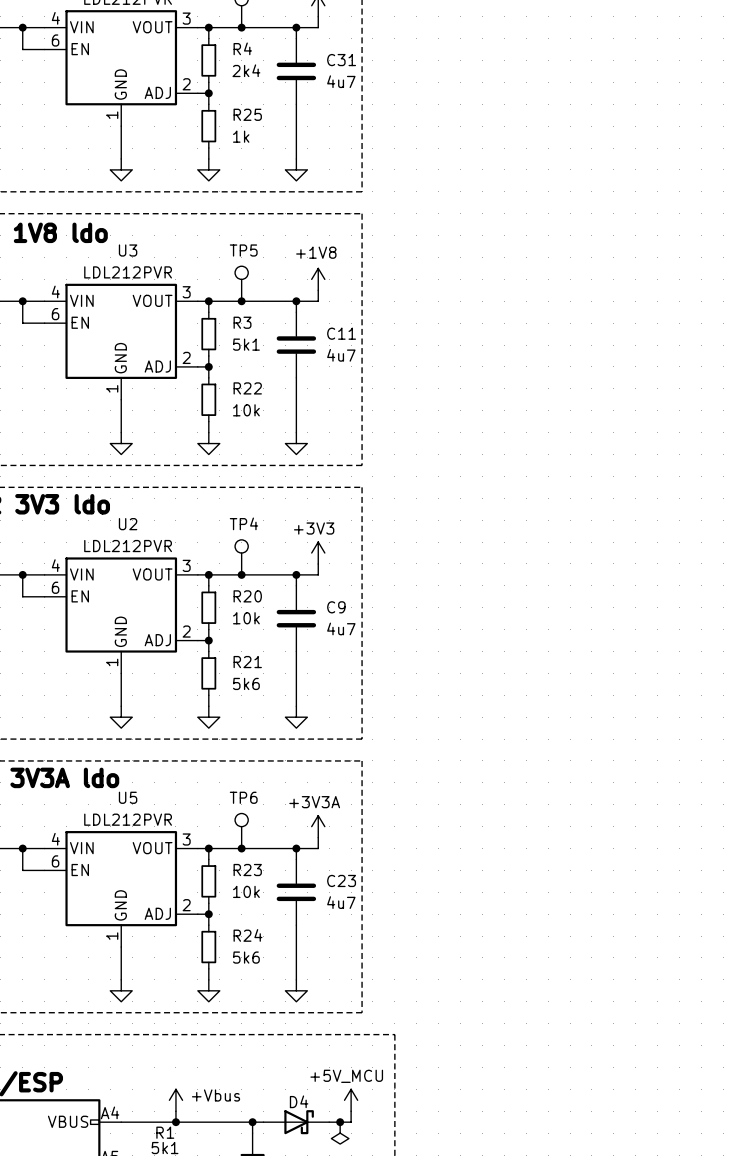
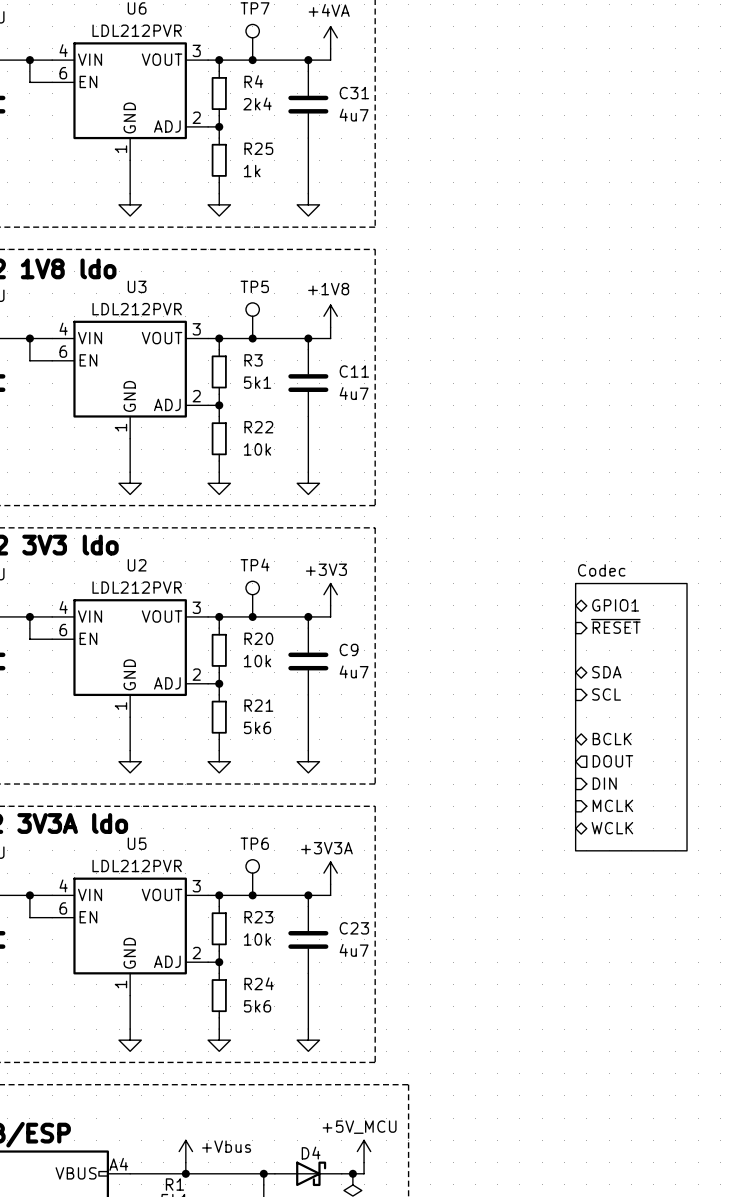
sheet pin: none -> GPIO1 (615, 605)
sheet pin: none -> ~{RESET} (615, 626)
sheet pin: none -> SDA (606, 672)
sheet pin: none -> SCL (606, 694)
sheet Codec: none -> (631, 717)
sheet pin: none -> BCLK (612, 739)
sheet pin: none -> DOUT (612, 761)
sheet pin: none -> DIN (604, 783)
sheet pin: none -> MCLK (612, 805)
sheet pin: none -> WCLK (612, 828)

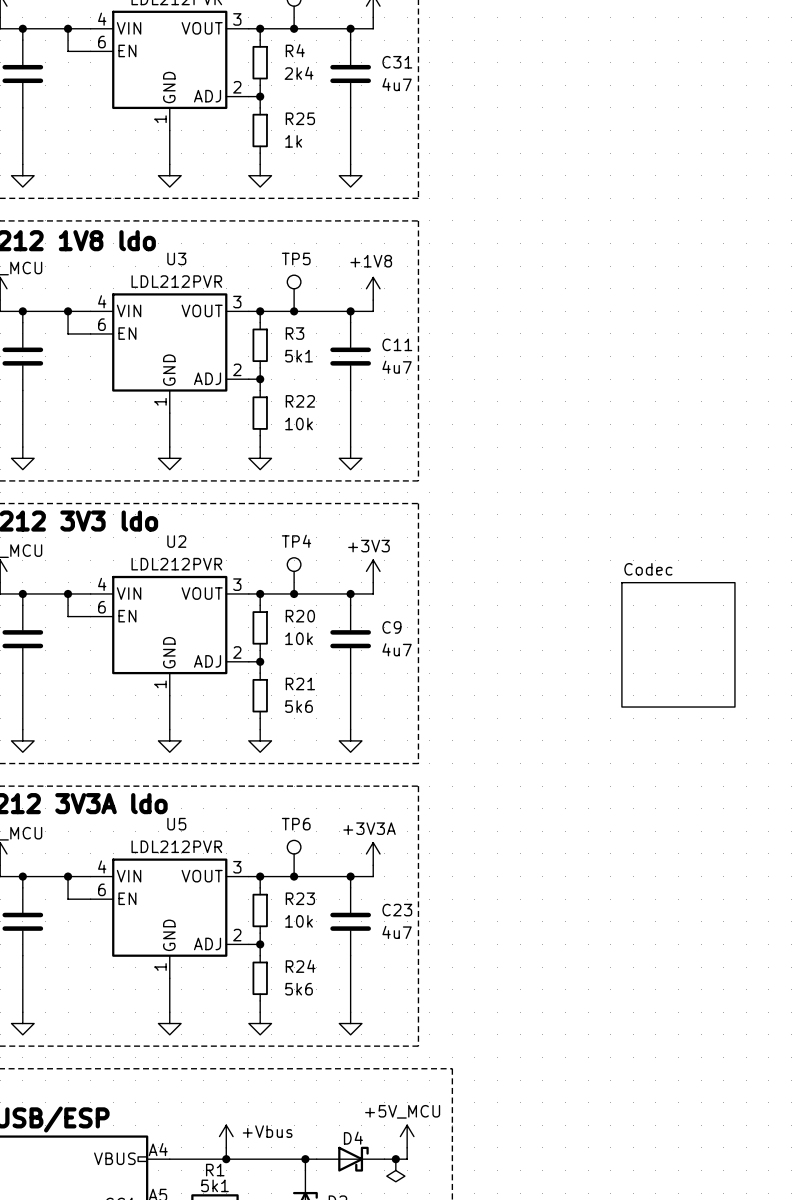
sheet pin: GPIO1 (615, 605) -> none
sheet pin: ~{RESET} (615, 626) -> none
sheet Codec: none -> (678, 644)
sheet pin: SDA (606, 672) -> none
sheet pin: SCL (606, 694) -> none
sheet Codec: (631, 717) -> none
sheet pin: BCLK (612, 739) -> none
sheet pin: DOUT (612, 761) -> none
sheet pin: DIN (604, 783) -> none
sheet pin: MCLK (612, 805) -> none
sheet pin: WCLK (612, 828) -> none

